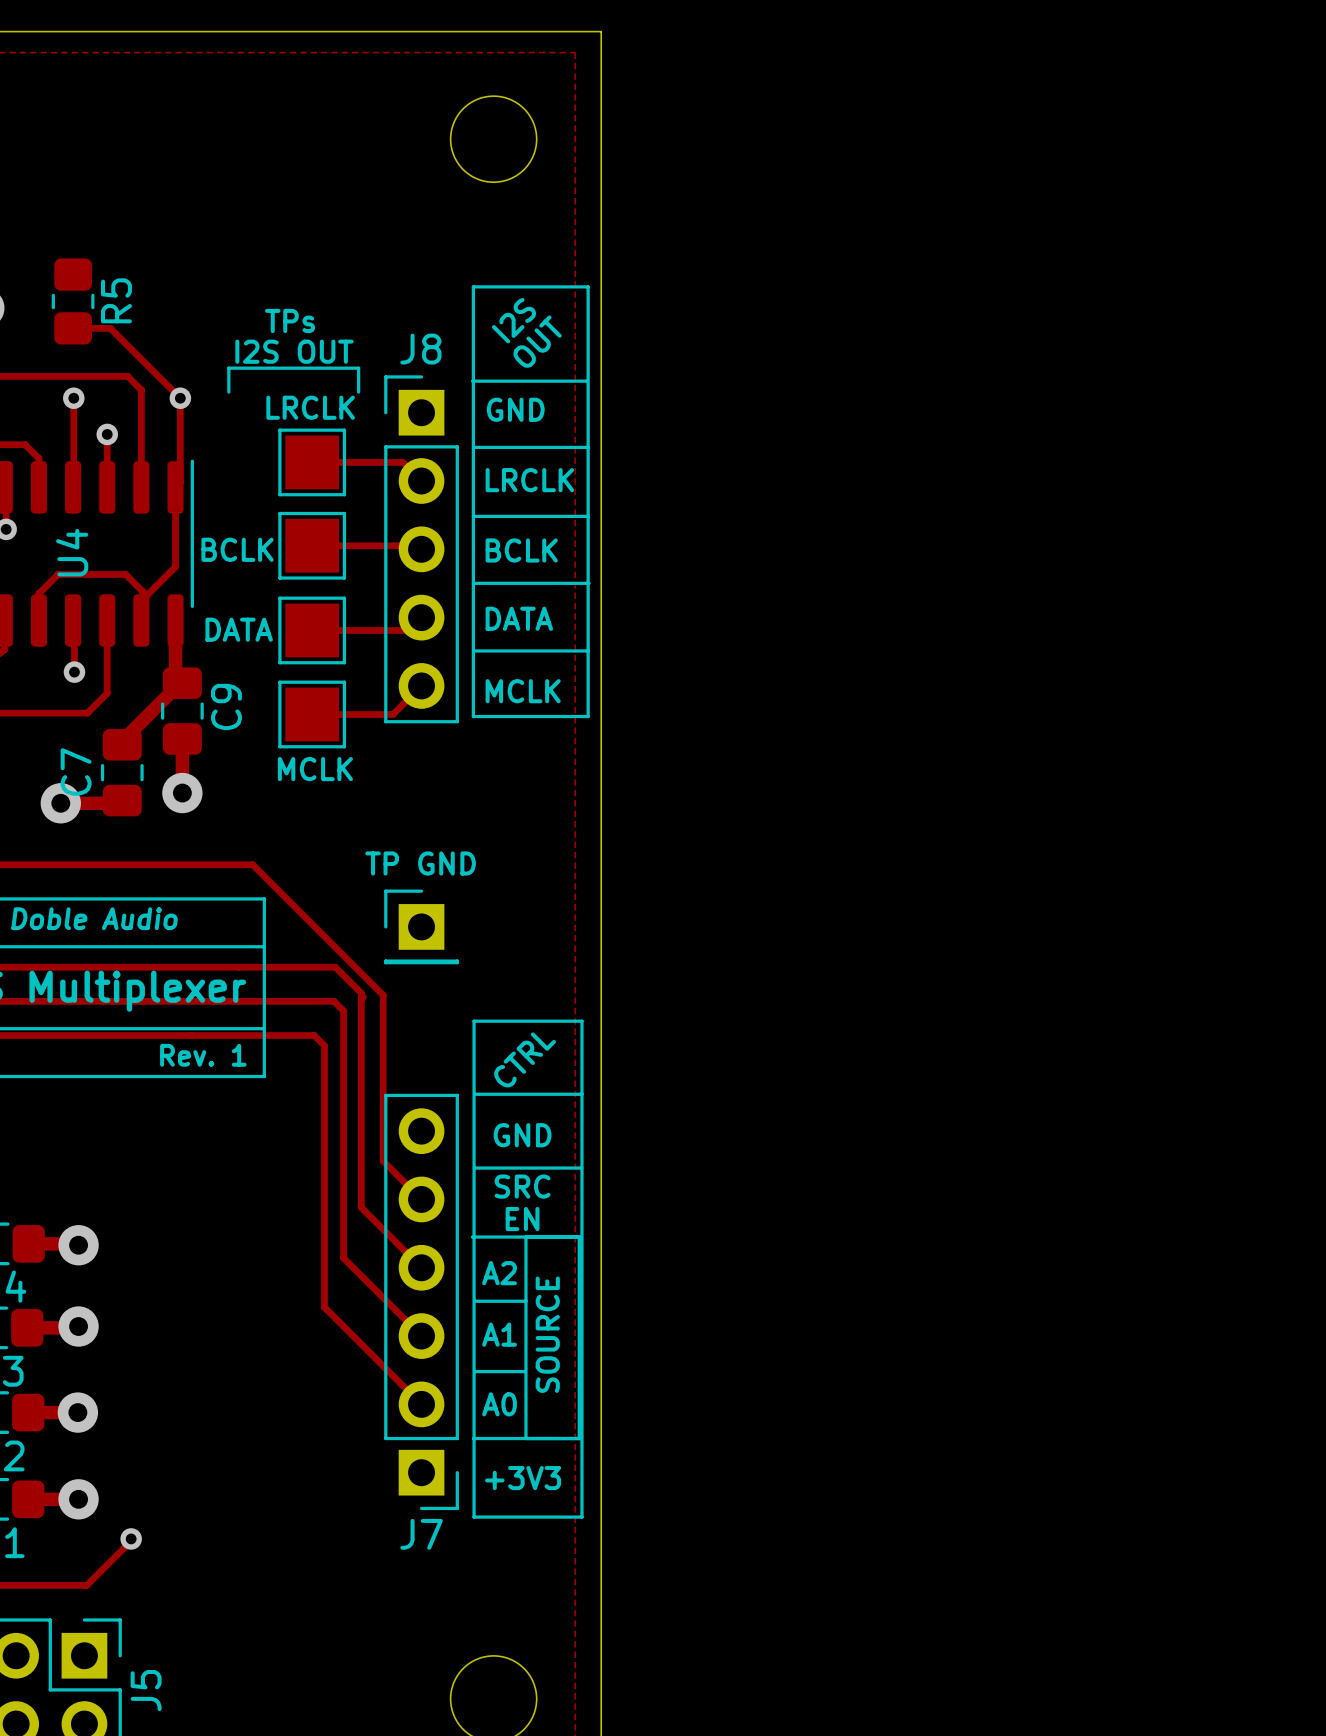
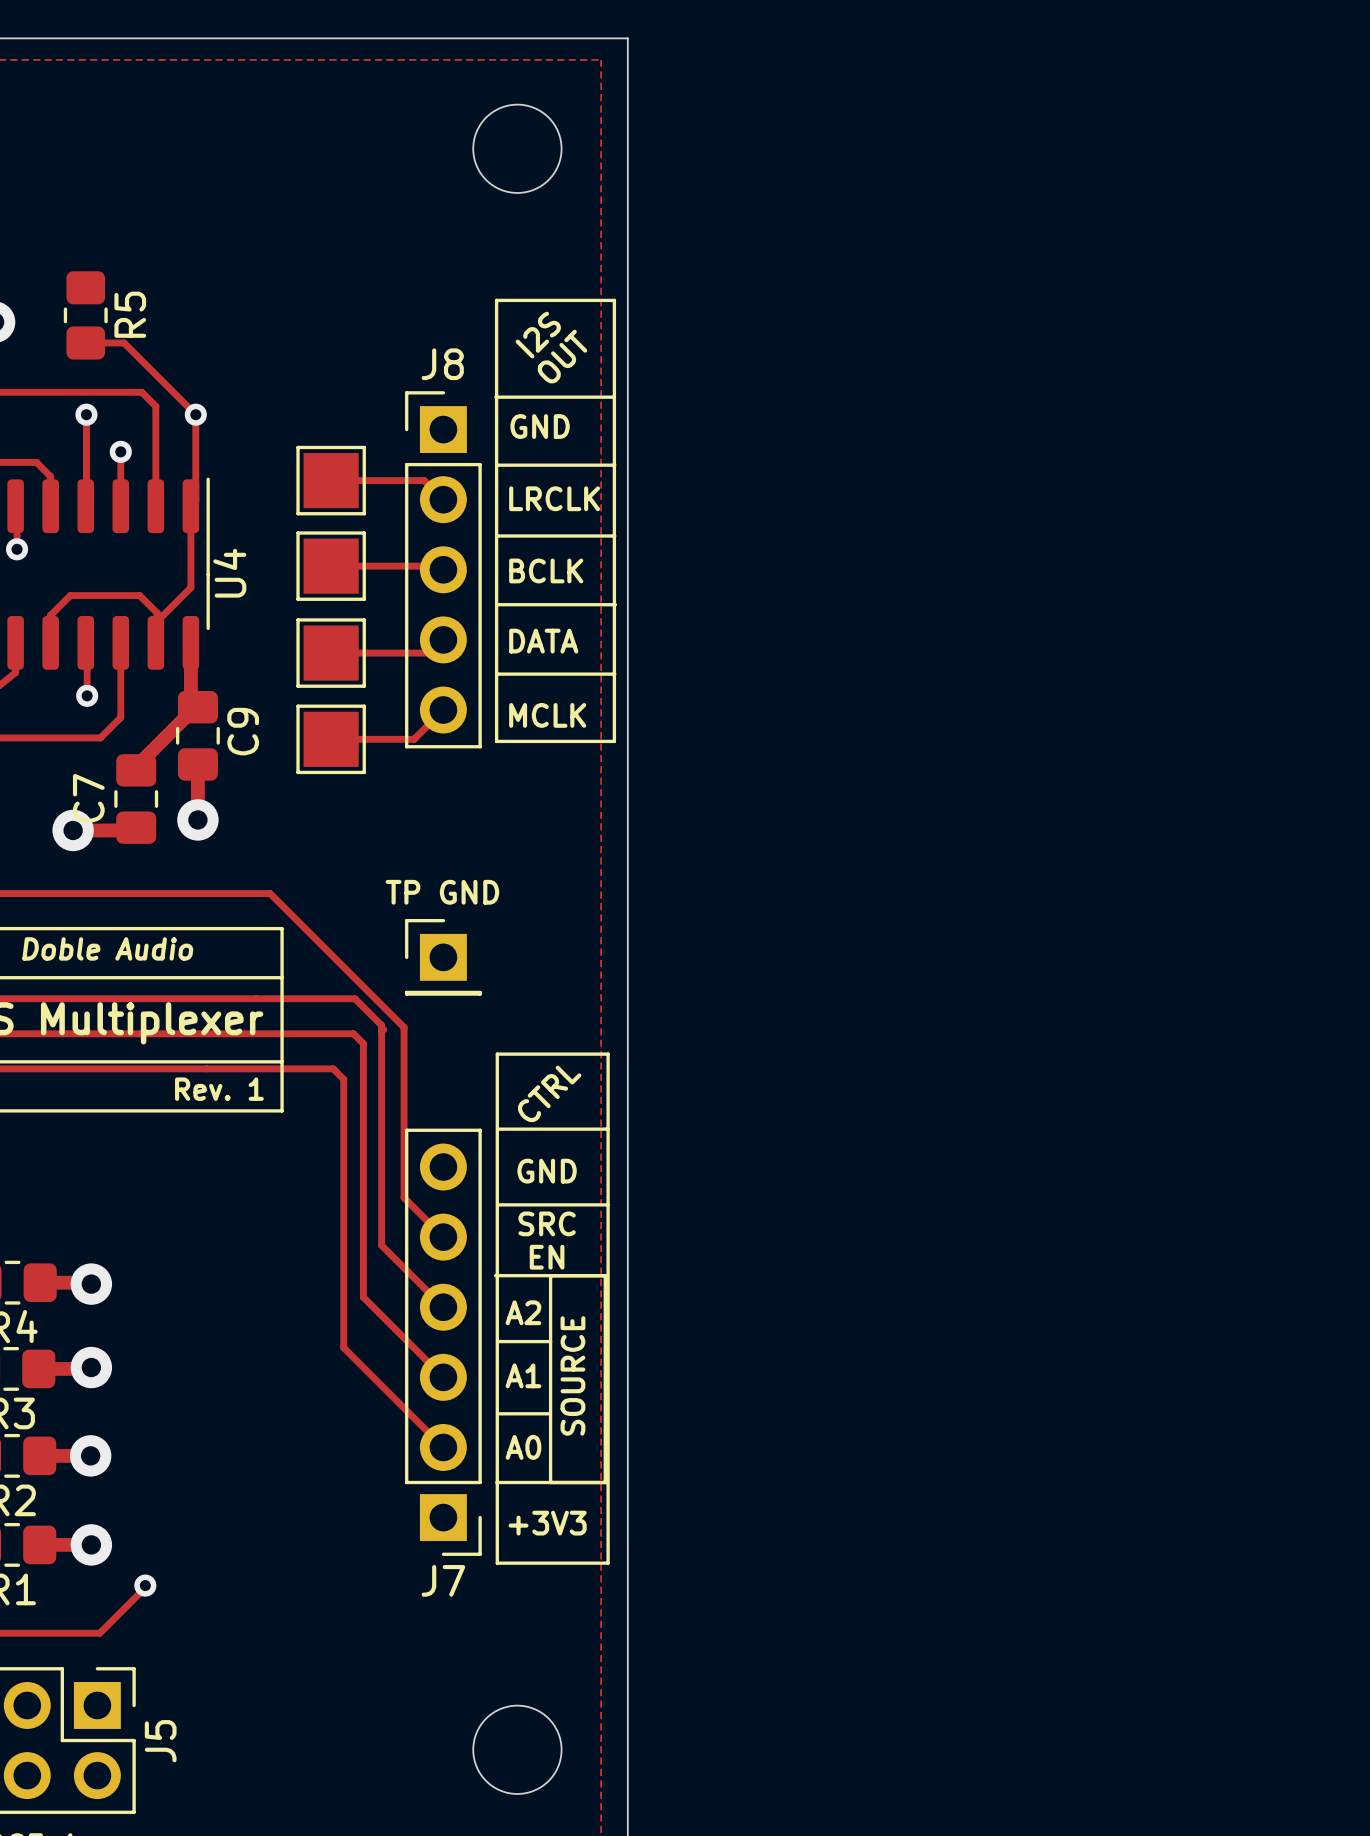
text: TPs (290, 320) -> none
text: I2S OUT (294, 351) -> none
line: (228, 392) (228, 368) (358, 368) (358, 392) -> none
text: LRCLK (310, 407) -> none
text: BCLK (237, 549) -> none
U4 name position: U4 (72, 552) -> U4 (229, 573)
text: DATA (239, 629) -> none
text: MCLK (315, 769) -> none

